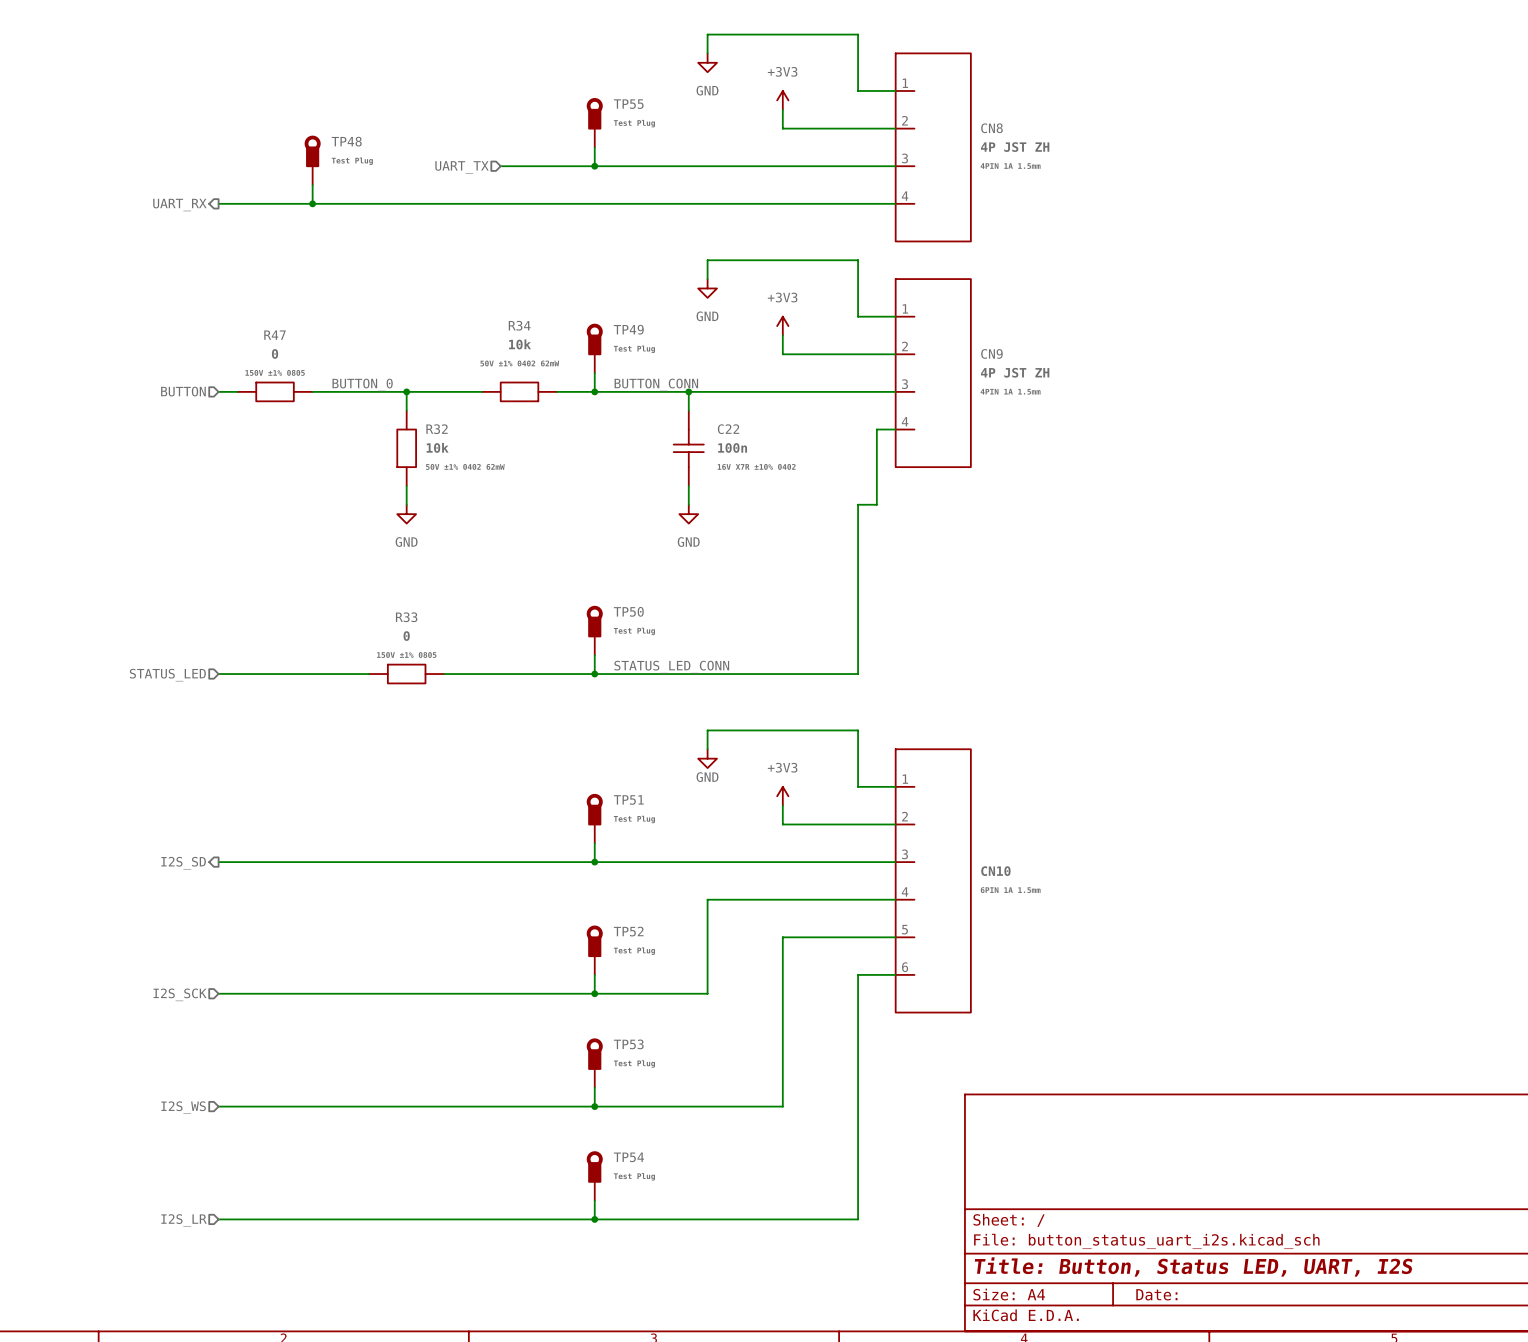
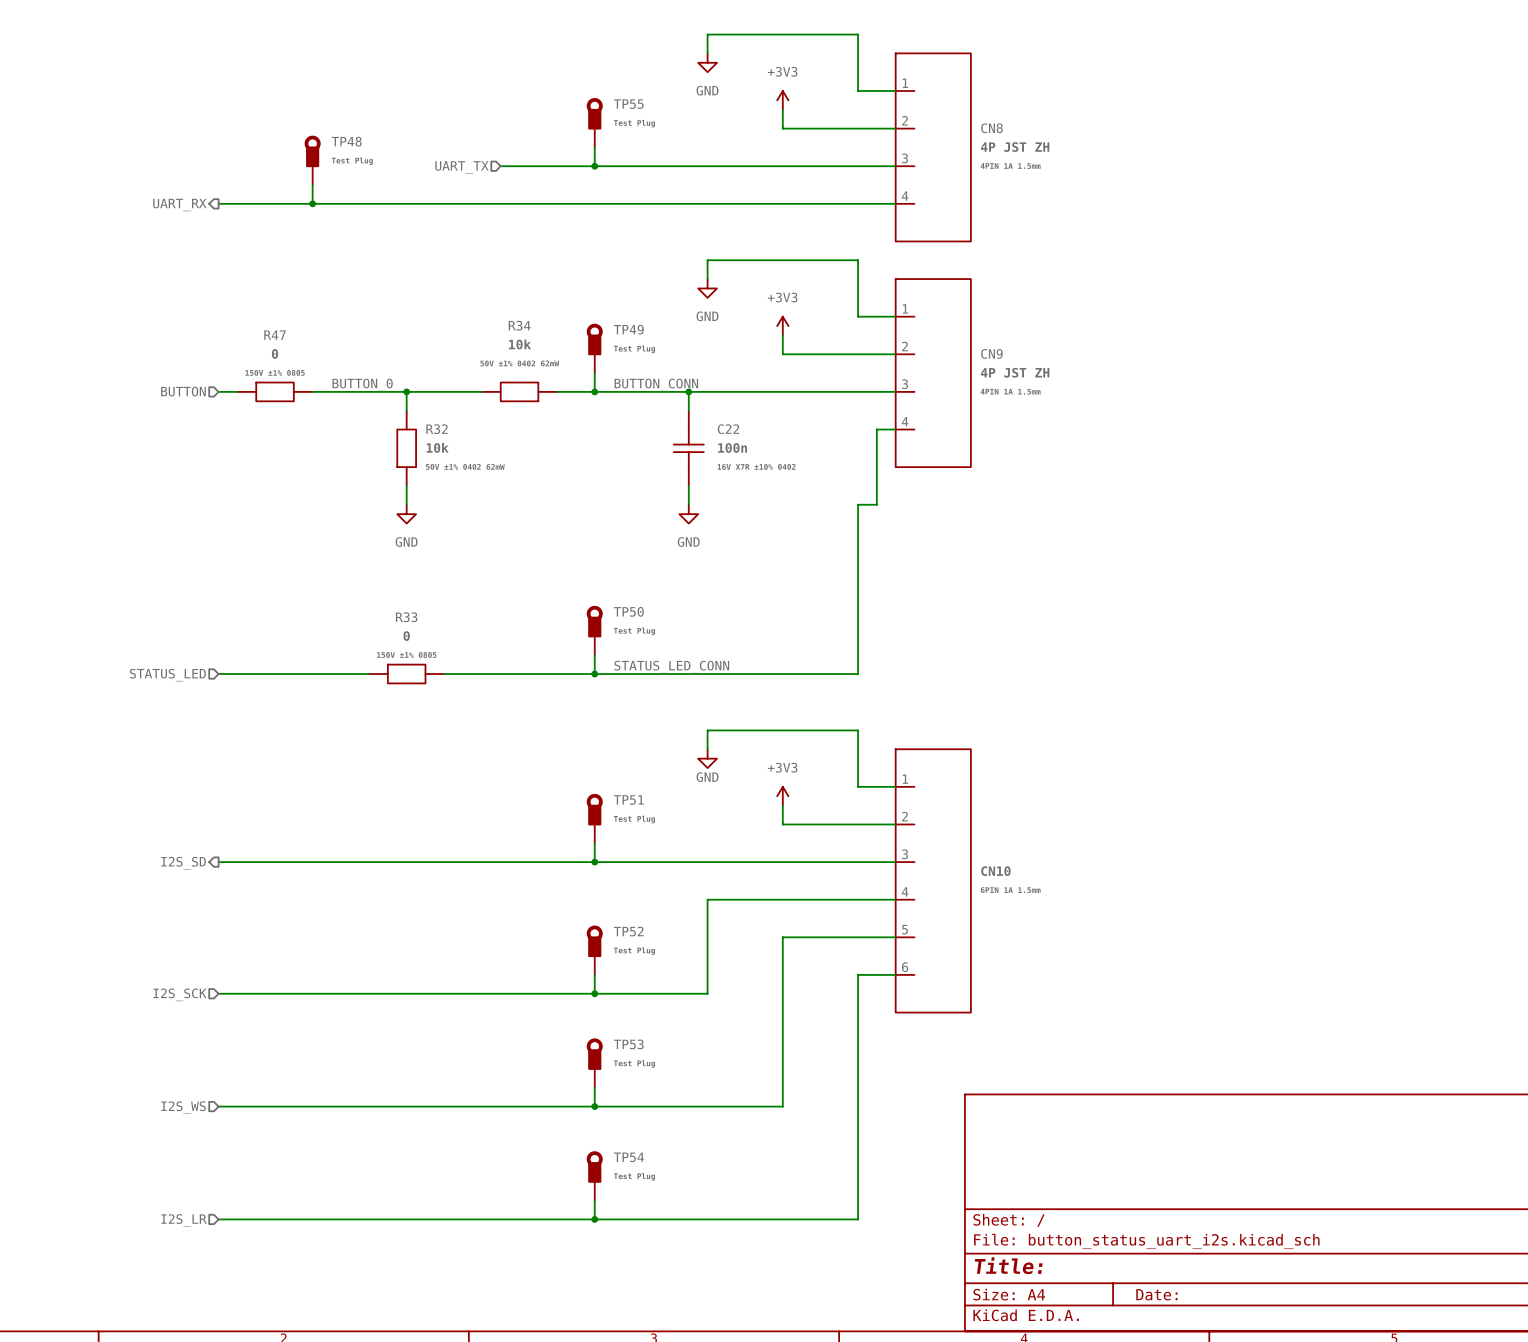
title block: Title: Button, Status LED, UART, I2S (1193, 1266) -> Title: (1008, 1265)

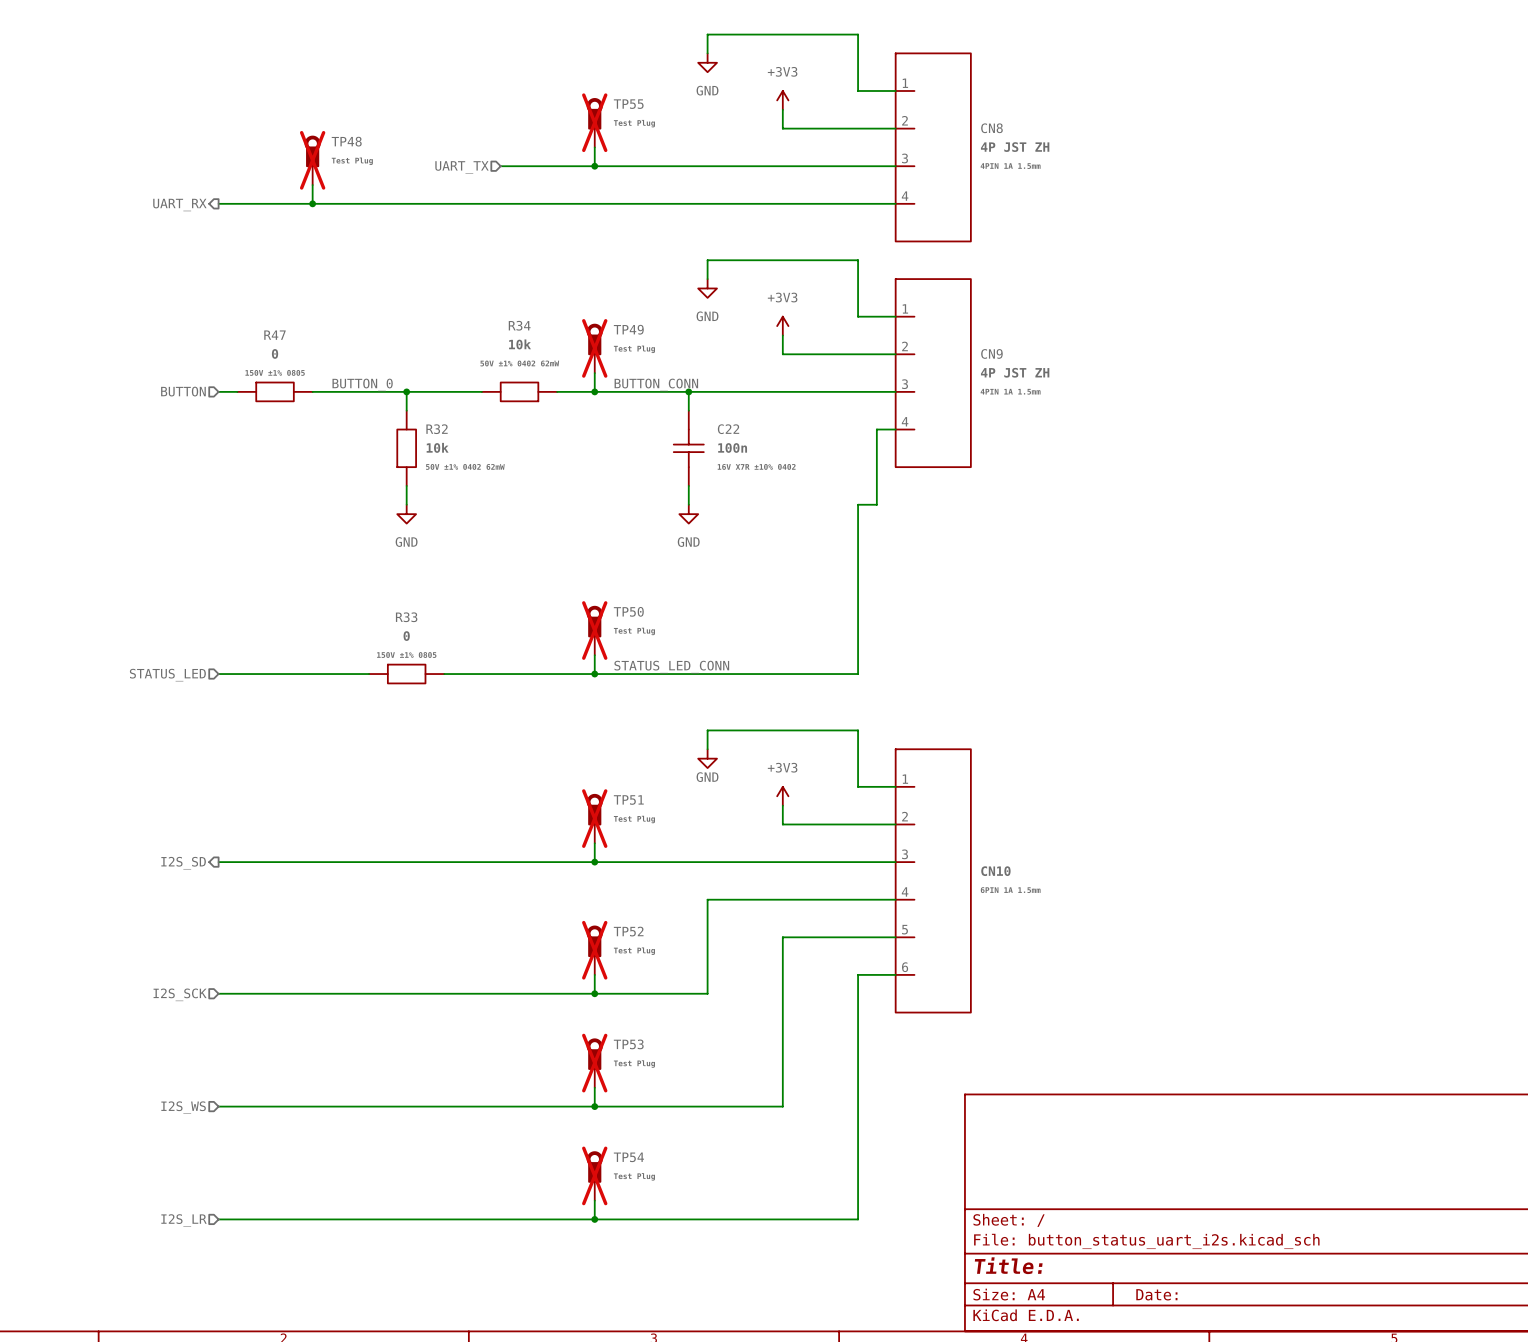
TP55 do-not-place cross: none -> (594, 122)
TP48 do-not-place cross: none -> (312, 160)
TP49 do-not-place cross: none -> (594, 348)
TP50 do-not-place cross: none -> (594, 630)
TP51 do-not-place cross: none -> (594, 818)
TP52 do-not-place cross: none -> (594, 950)
TP53 do-not-place cross: none -> (594, 1063)
TP54 do-not-place cross: none -> (594, 1175)

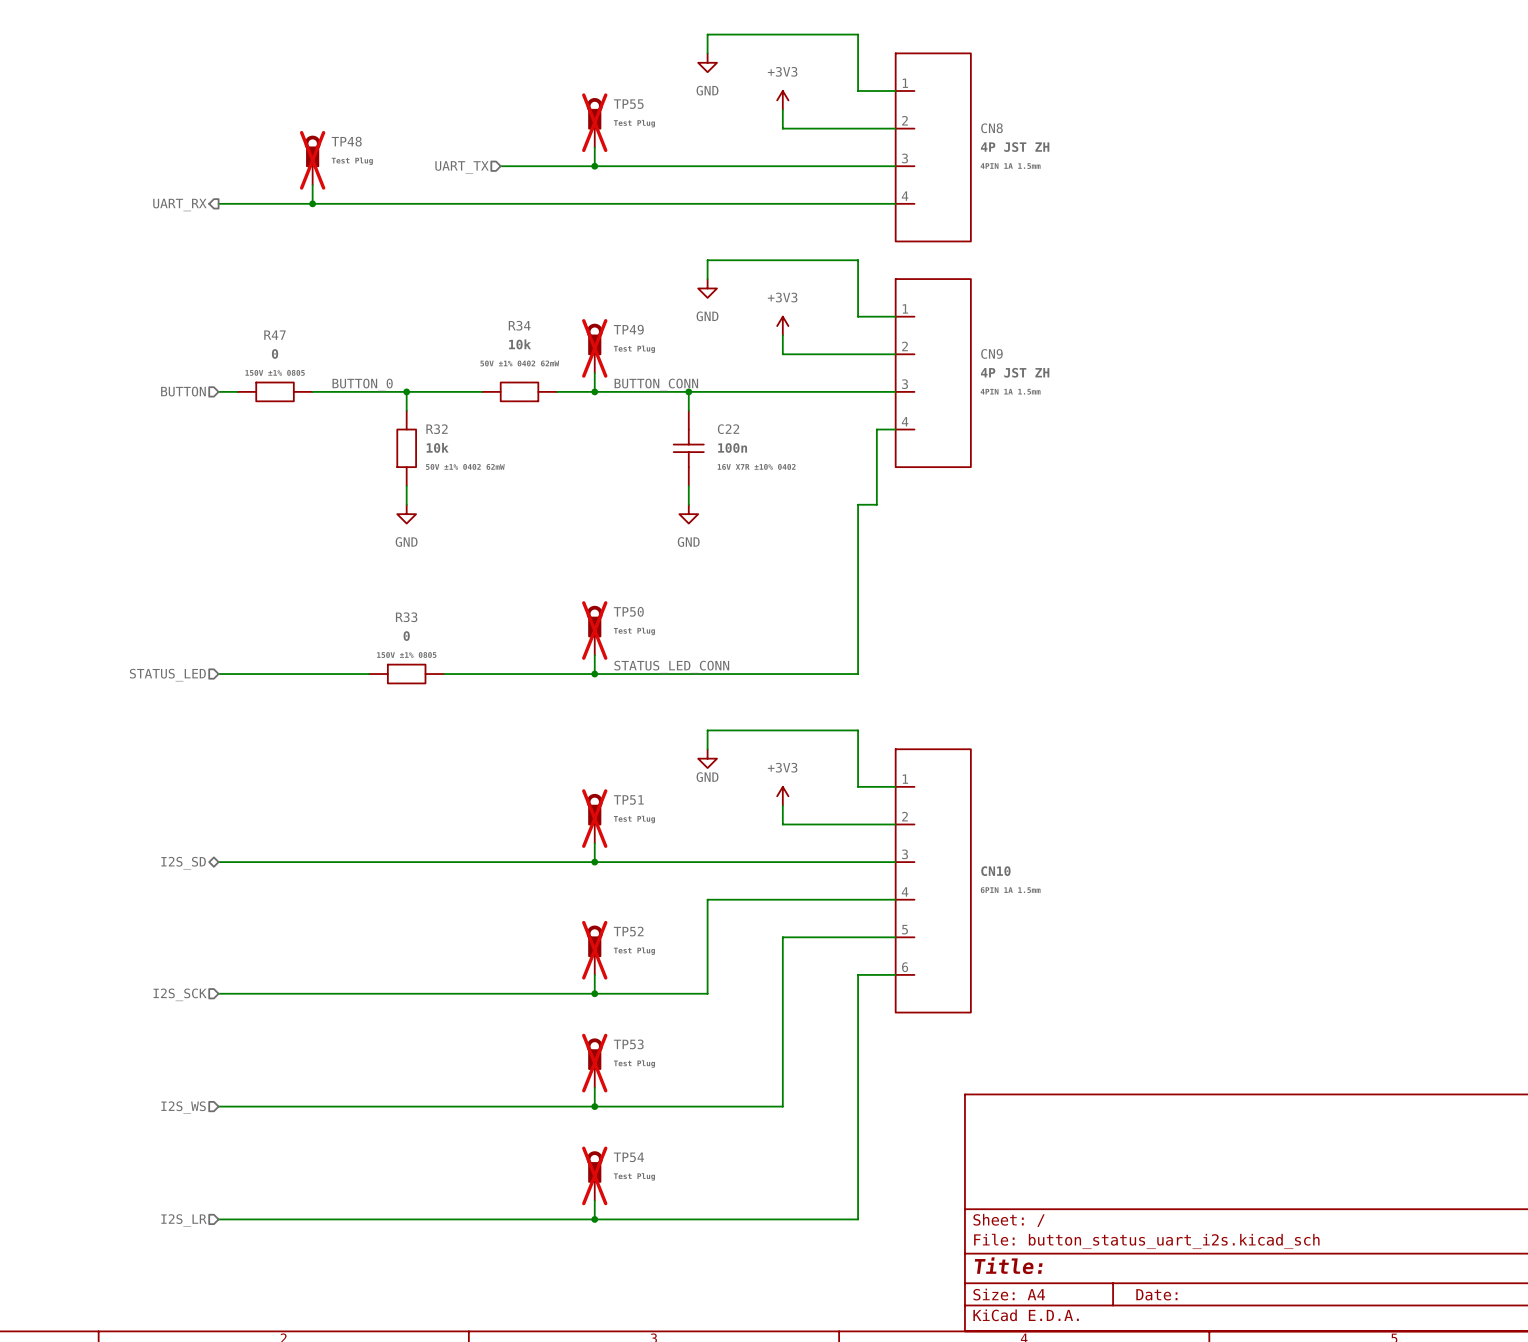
hierarchical label shape: output (183, 863) -> bidirectional (183, 863)

